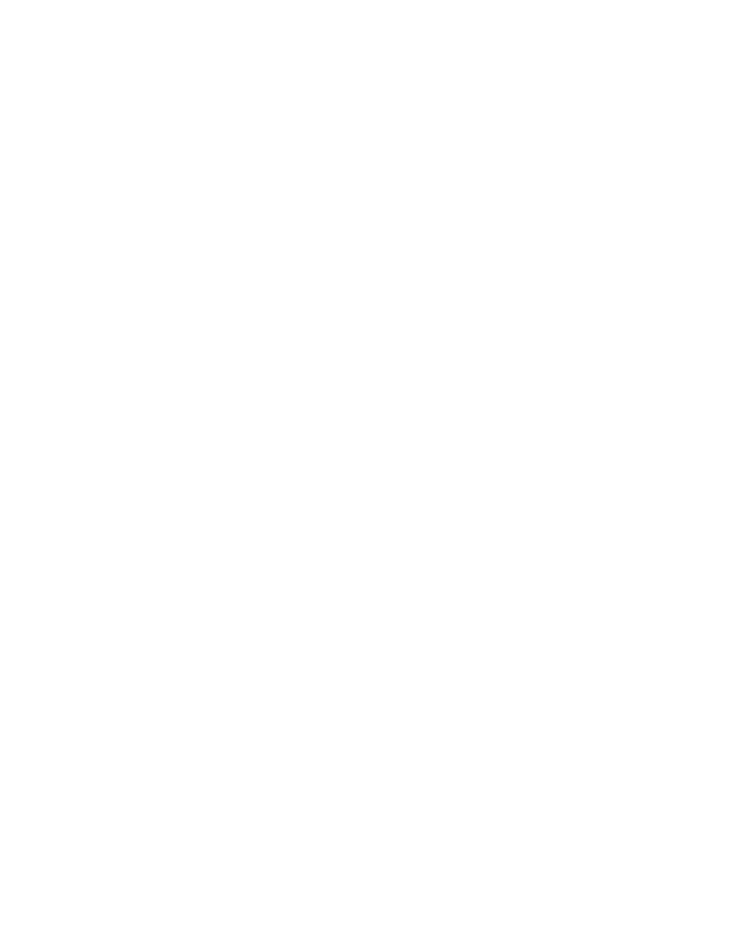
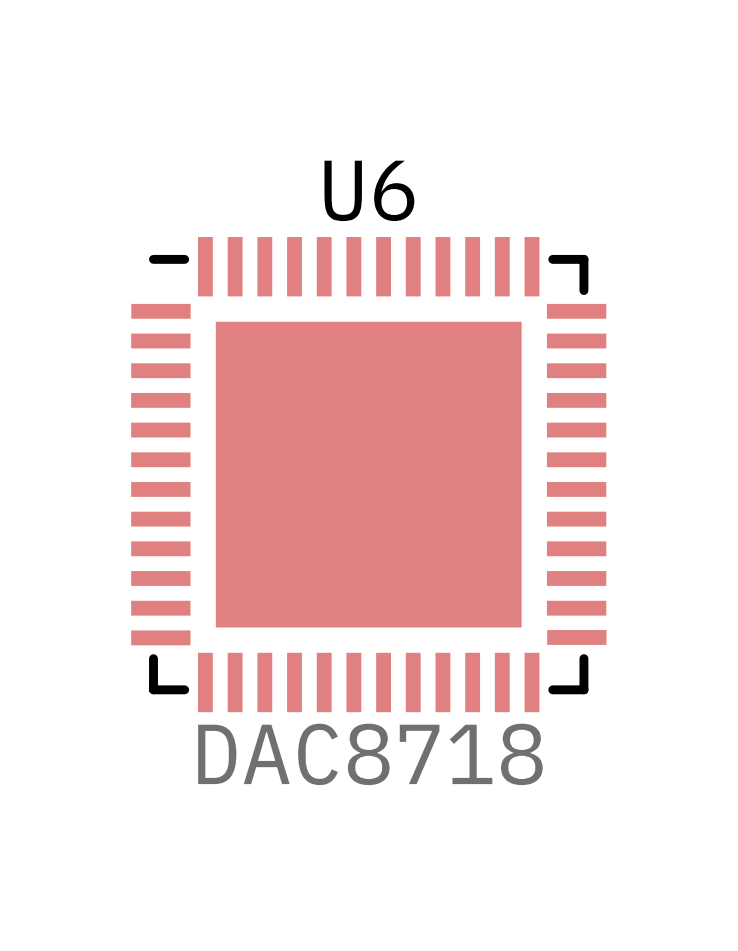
U6: none -> DAC8718 (368, 474)

